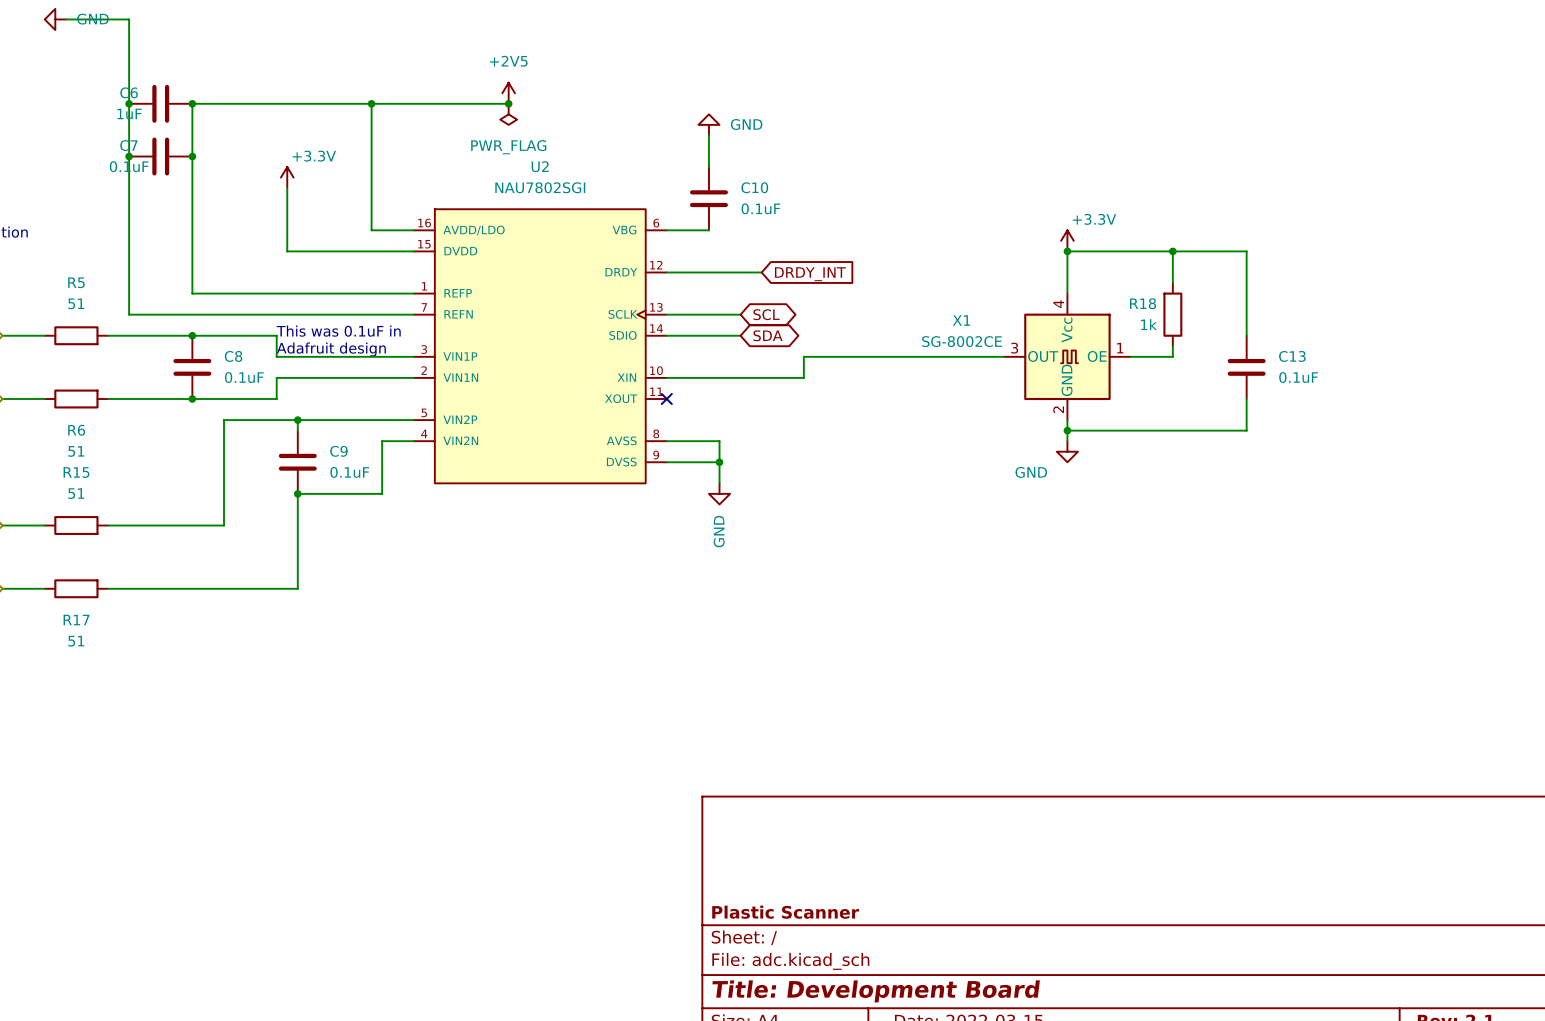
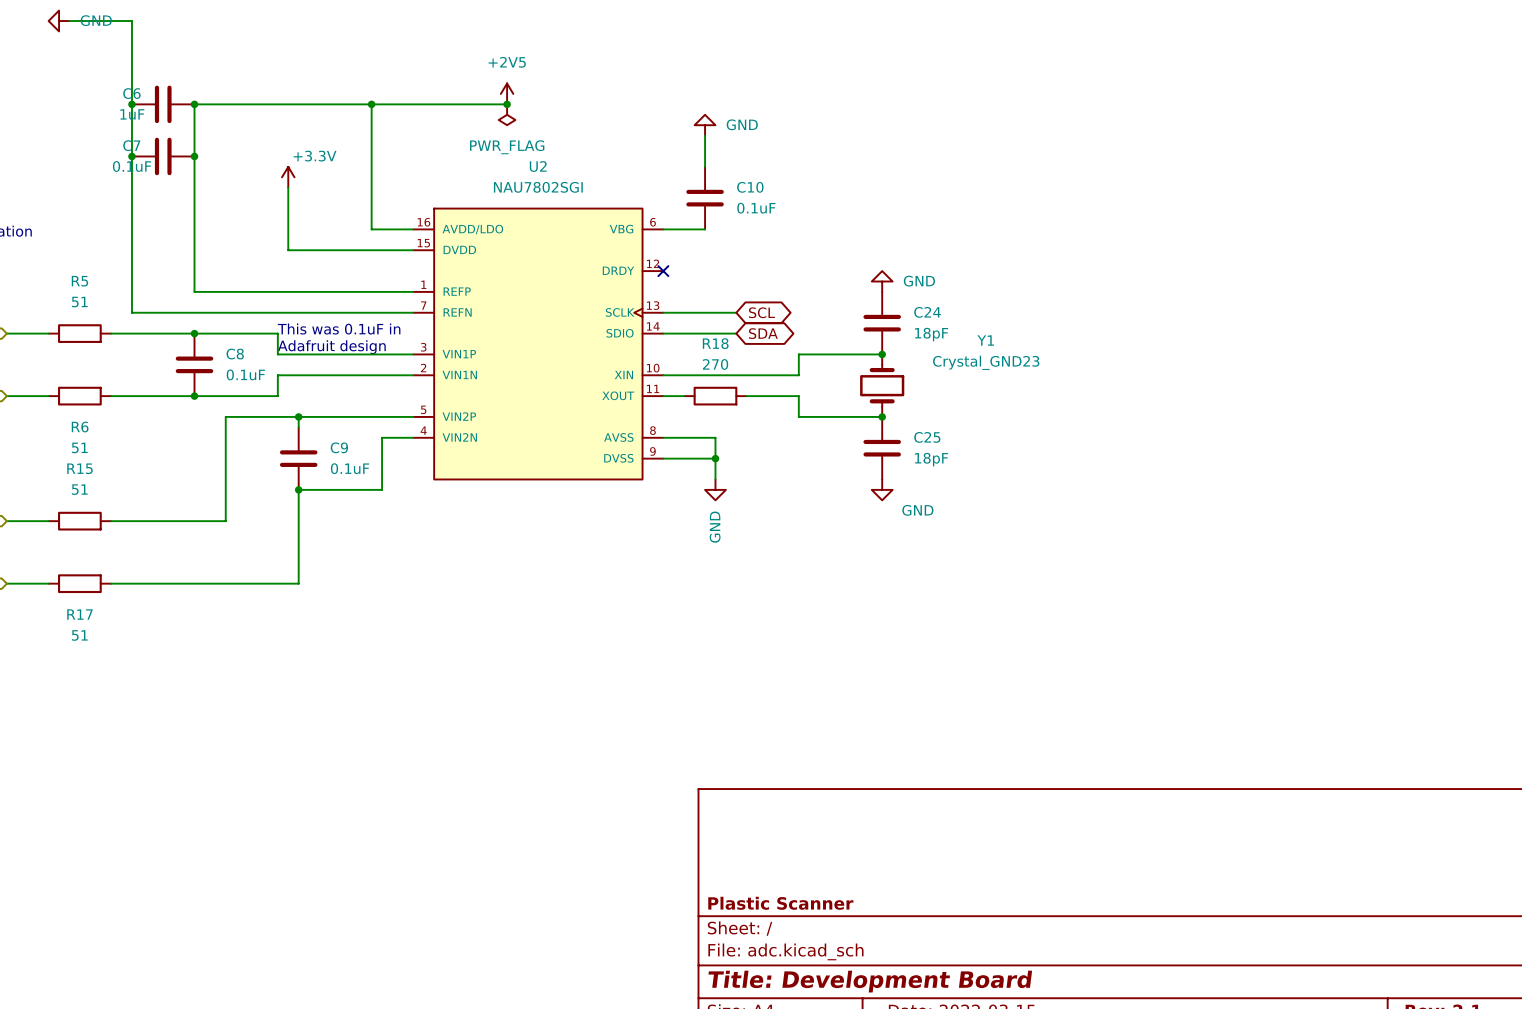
power symbol: +3.3V (1067, 240) -> none
junction: (1067, 251) -> none
wire: (1172, 251) (1172, 283) -> none
junction: (1172, 251) -> none
wire: (666, 272) (761, 272) -> none
no-connect mark: none -> (663, 271)
global label: DRDY_INT (810, 274) -> none
power symbol: none -> GND (882, 281)
wire: (1067, 293) (1067, 251) (1246, 251) (1246, 335) -> none
R18 name position: R18 (1143, 303) -> R18 (715, 343)
R18 rotation: 0° (1172, 314) -> 90° clockwise (715, 396)
R18 position: (1172, 314) -> (715, 396)
R18 value: 1k (1149, 324) -> 270 (715, 364)
C24: none -> 18pF (882, 323)
wire: (1172, 346) (1172, 356) (1130, 356) -> none
wire: (888, 356) (1004, 356) -> none
junction: none -> (882, 354)
X1: SG-8002CE (1067, 356) -> none
C13: 0.1uF (1246, 367) -> none
Y1: none -> Crystal_GND23 (882, 385)
wire: none -> (663, 396) (684, 396)
no-connect mark: (666, 399) -> none
wire: none -> (746, 396) (798, 396) (798, 416) (882, 416)
wire: (1246, 399) (1246, 430) (1067, 430) -> none
junction: none -> (882, 416)
wire: (1067, 420) (1067, 441) -> none
junction: (1067, 430) -> none
C25: none -> 18pF (882, 448)
power symbol: GND (1067, 451) -> none
power symbol: none -> GND (882, 489)

